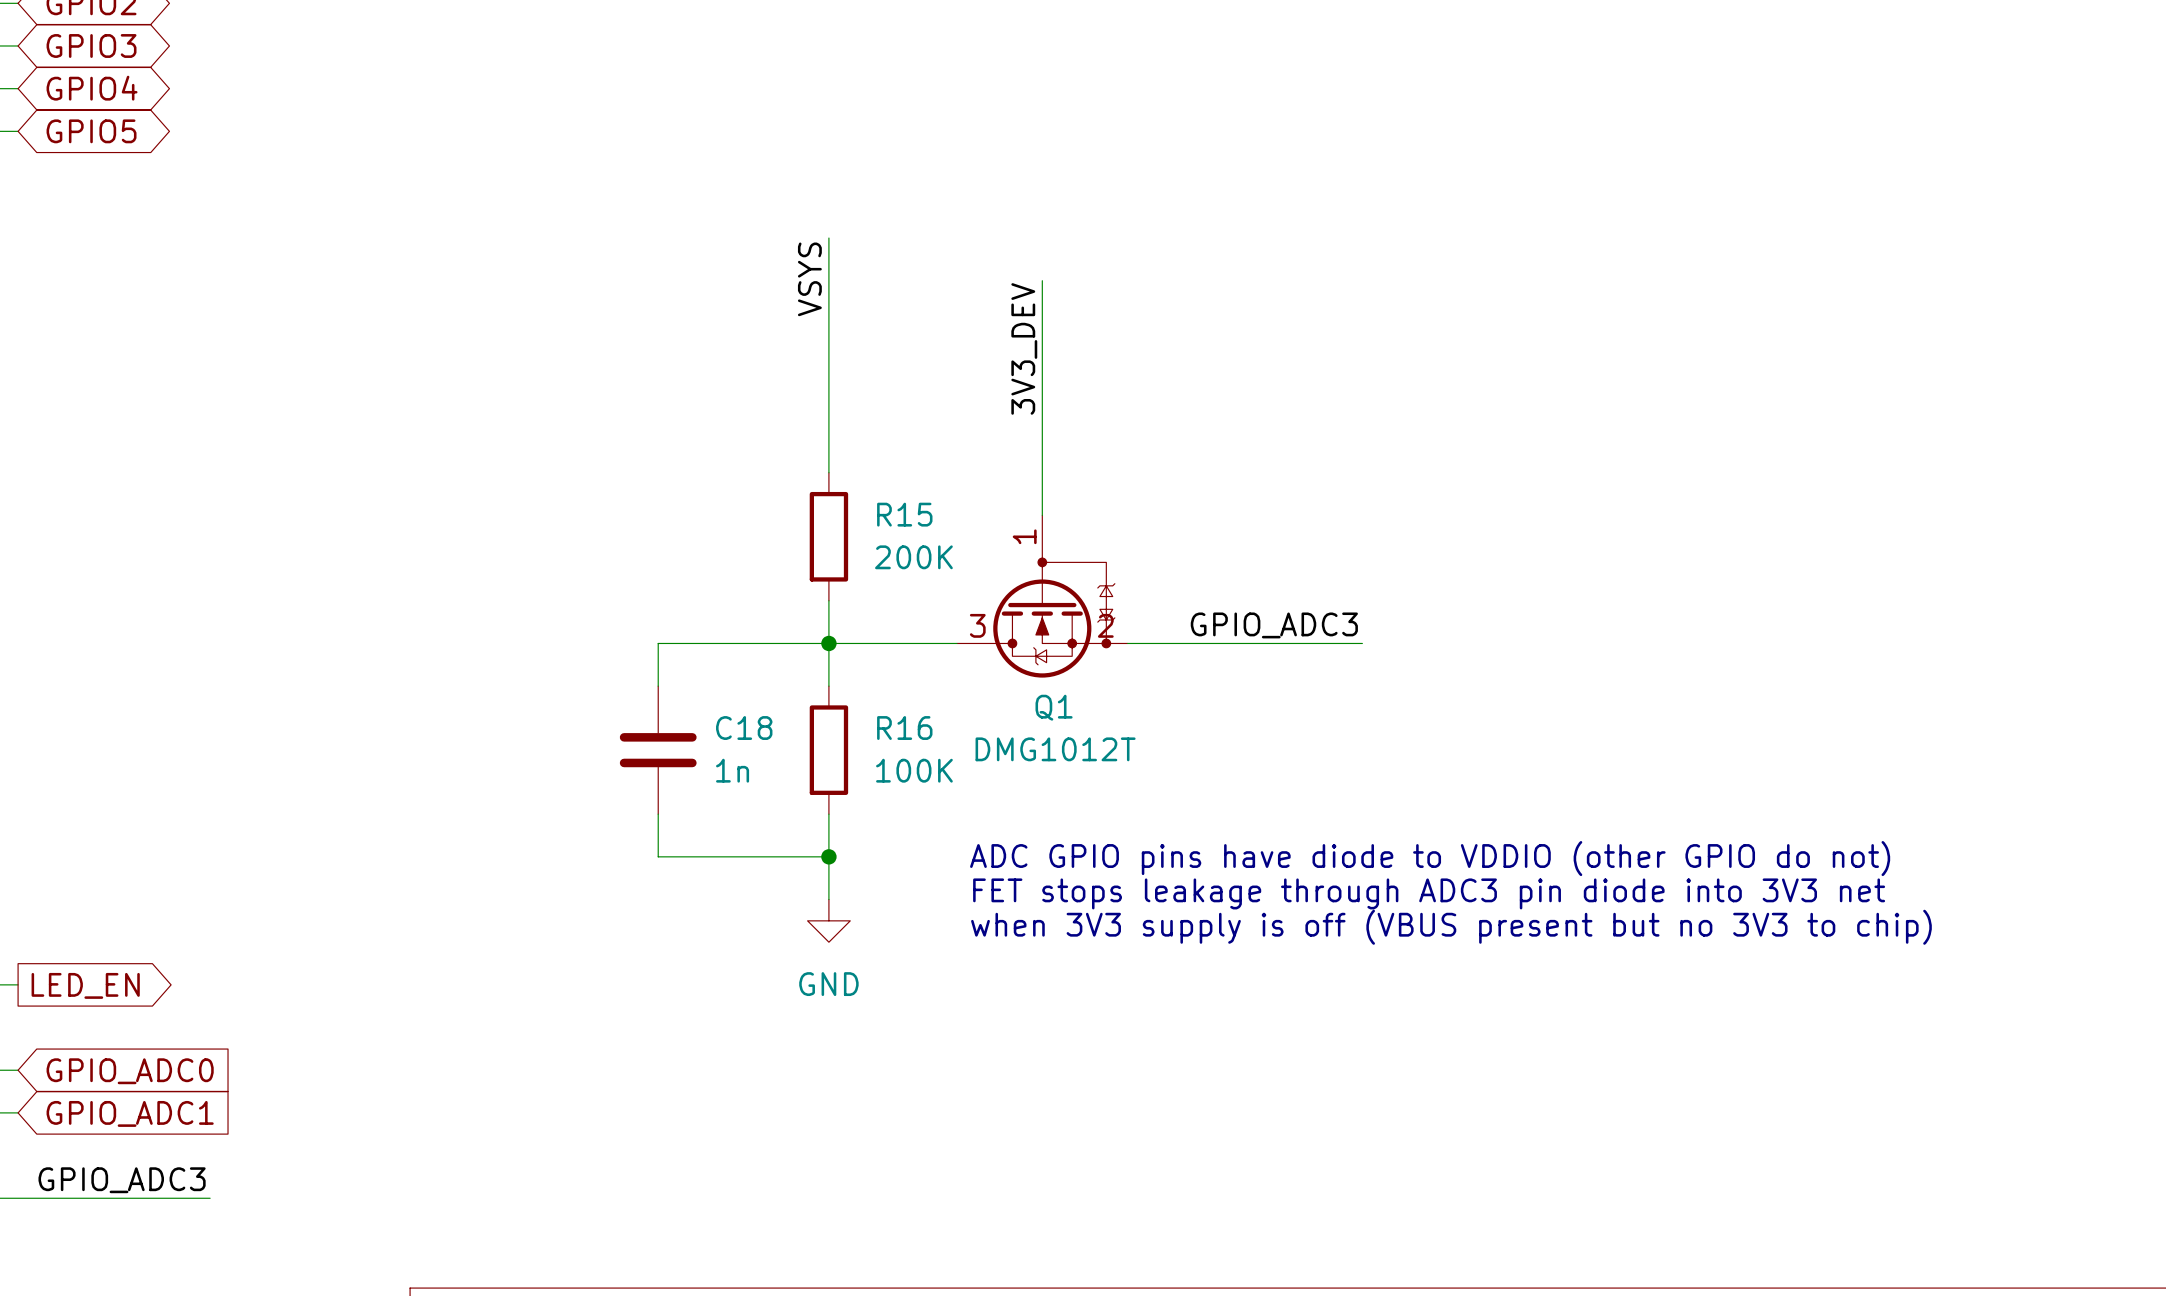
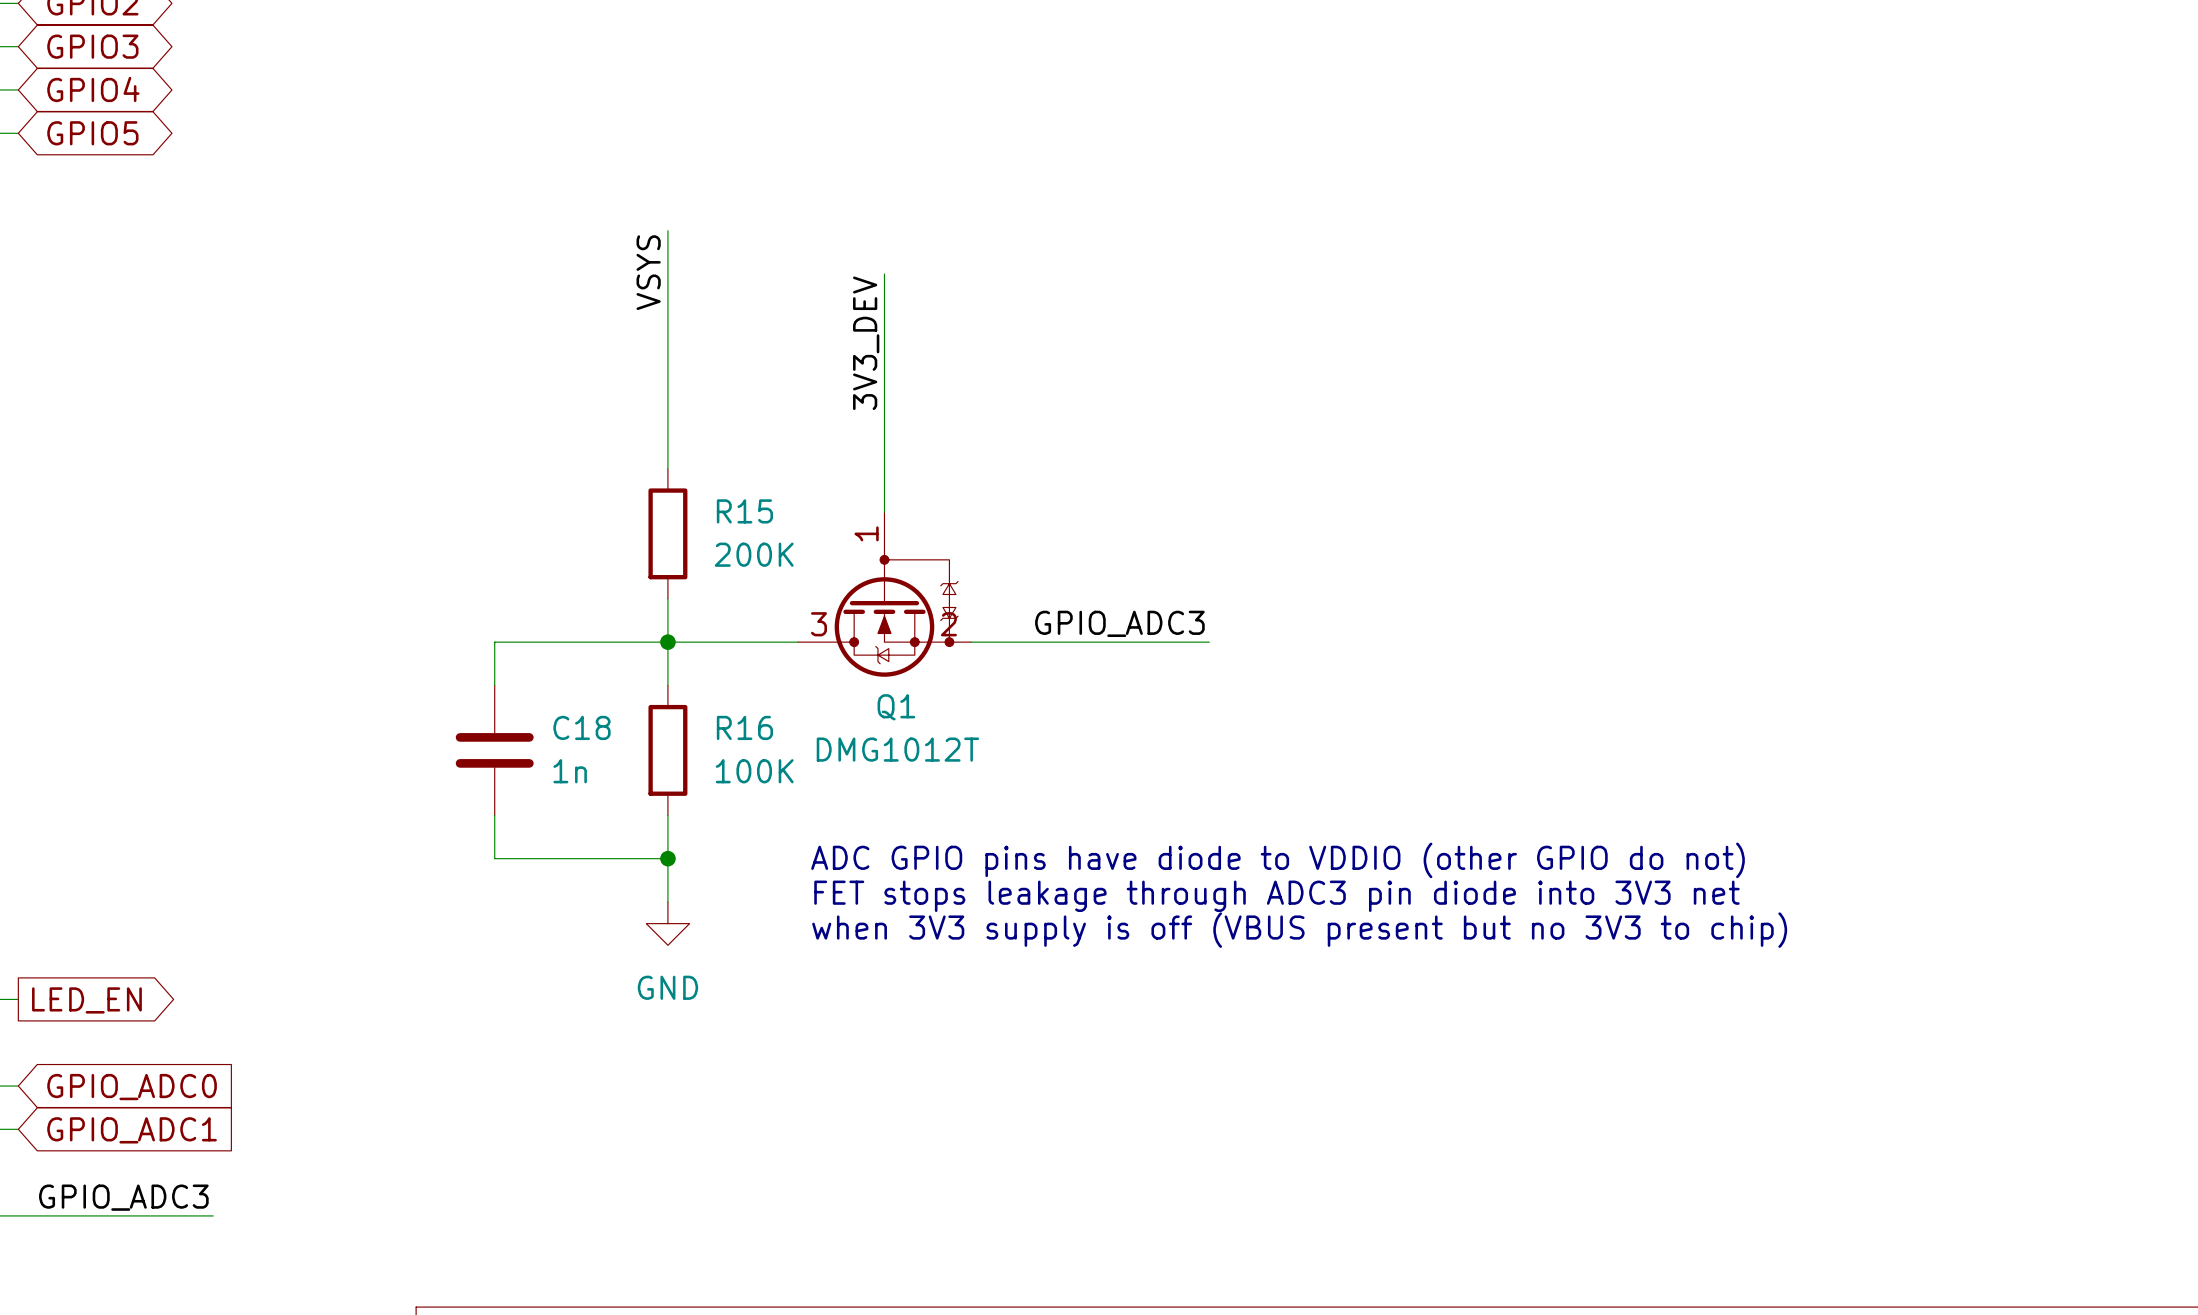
wire: (828, 238) (828, 472) -> (667, 230) (667, 468)
label position: VSYS (809, 279) -> VSYS (648, 272)
wire: (1042, 280) (1042, 515) -> (884, 274) (884, 512)
label position: 3V3_DEV (1024, 348) -> 3V3_DEV (866, 343)
R15 position: (828, 536) -> (667, 533)
Q1 position: (1042, 596) -> (884, 594)
wire: (828, 600) (828, 686) -> none
label position: GPIO_ADC3 (1274, 625) -> GPIO_ADC3 (1119, 623)
junction: none -> (667, 642)
wire: none -> (797, 642) (494, 642) (494, 685)
wire: (658, 643) (956, 643) -> (667, 652) (667, 598)
junction: (828, 643) -> none
wire: (1127, 643) (1362, 643) -> (971, 642) (1209, 642)
C18 position: (658, 750) -> (494, 750)
R16 position: (828, 750) -> (667, 750)
wire: none -> (494, 815) (494, 858) (667, 858)
wire: (828, 814) (828, 899) -> none
junction: none -> (667, 858)
wire: (658, 856) (828, 856) -> (667, 869) (667, 901)
junction: (828, 856) -> none
text position: ADC GPIO pins have diode to VDDIO (other GPIO do not) (1430, 858) -> ADC GPIO pins have diode to VDDIO (other GPIO do not) (1277, 860)
text position: FET stops leakage through ADC3 pin diode into 3V3 net (1429, 893) -> FET stops leakage through ADC3 pin diode into 3V3 net (1276, 896)
power symbol position: GND (828, 920) -> GND (667, 923)
text position: when 3V3 supply is off (VBUS present but no 3V3 to chip) (1451, 927) -> when 3V3 supply is off (VBUS present but no 3V3 to chip) (1299, 930)

